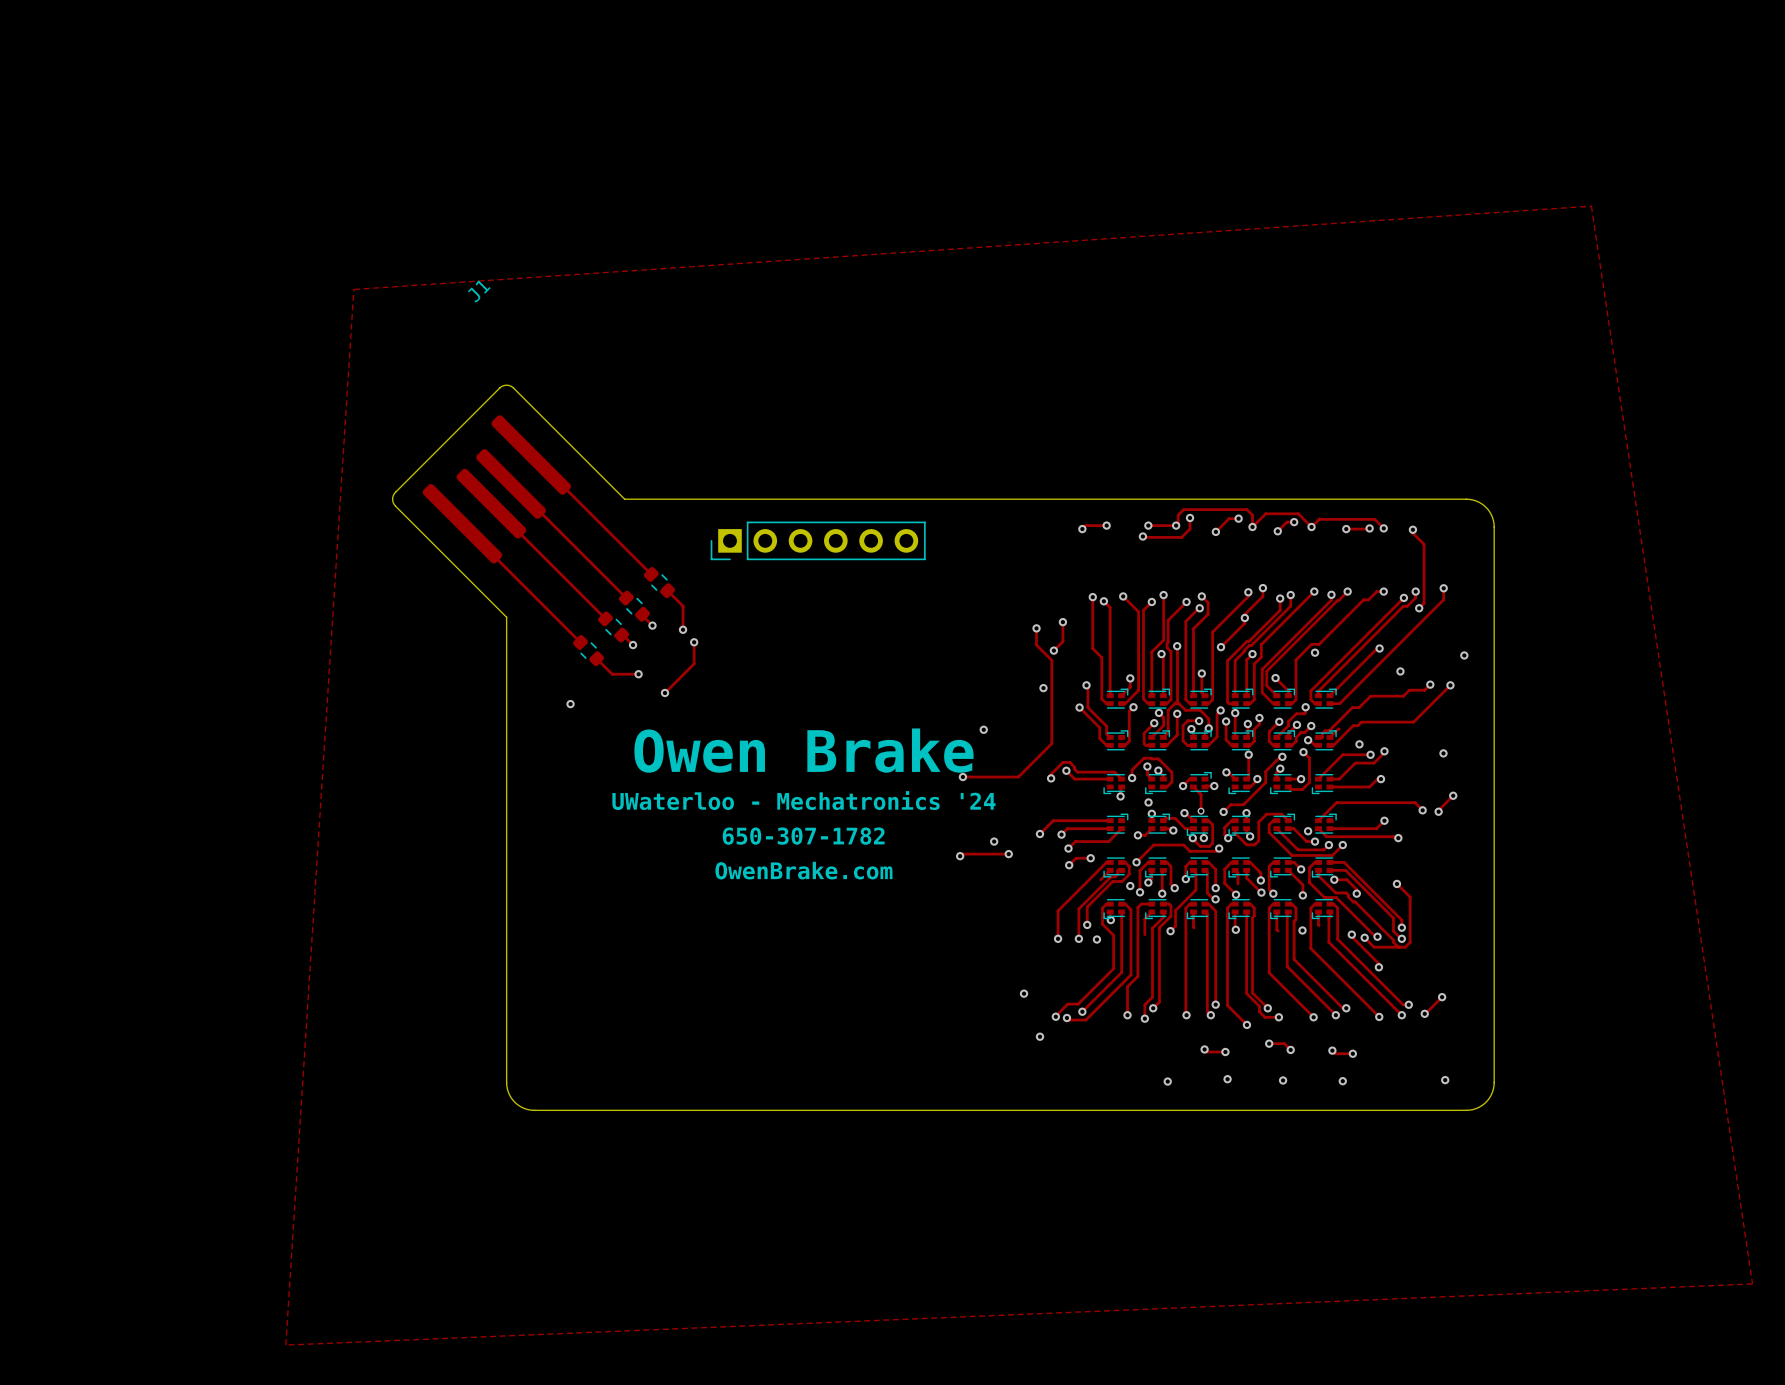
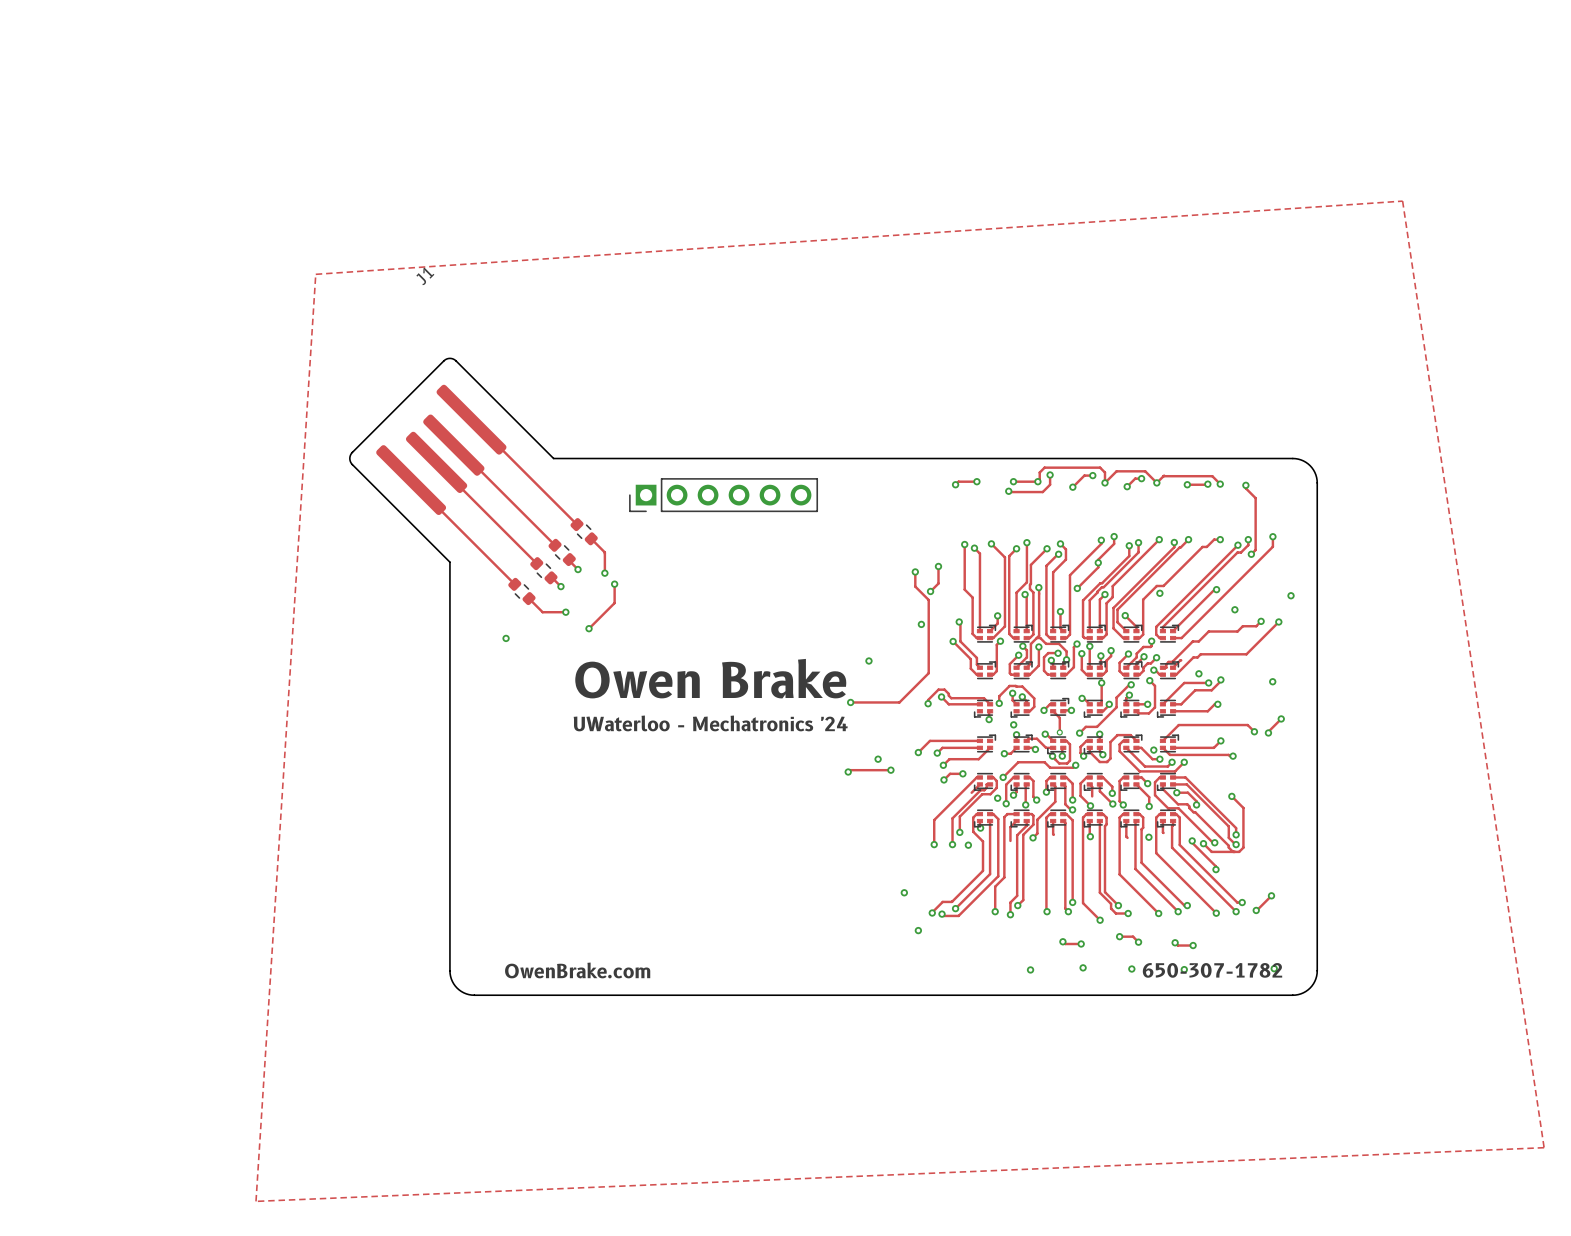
text: 650-307-1782 (803, 836) -> none
text position: OwenBrake.com (803, 870) -> OwenBrake.com (577, 970)
text: none -> 650-307-1782 (1212, 970)

